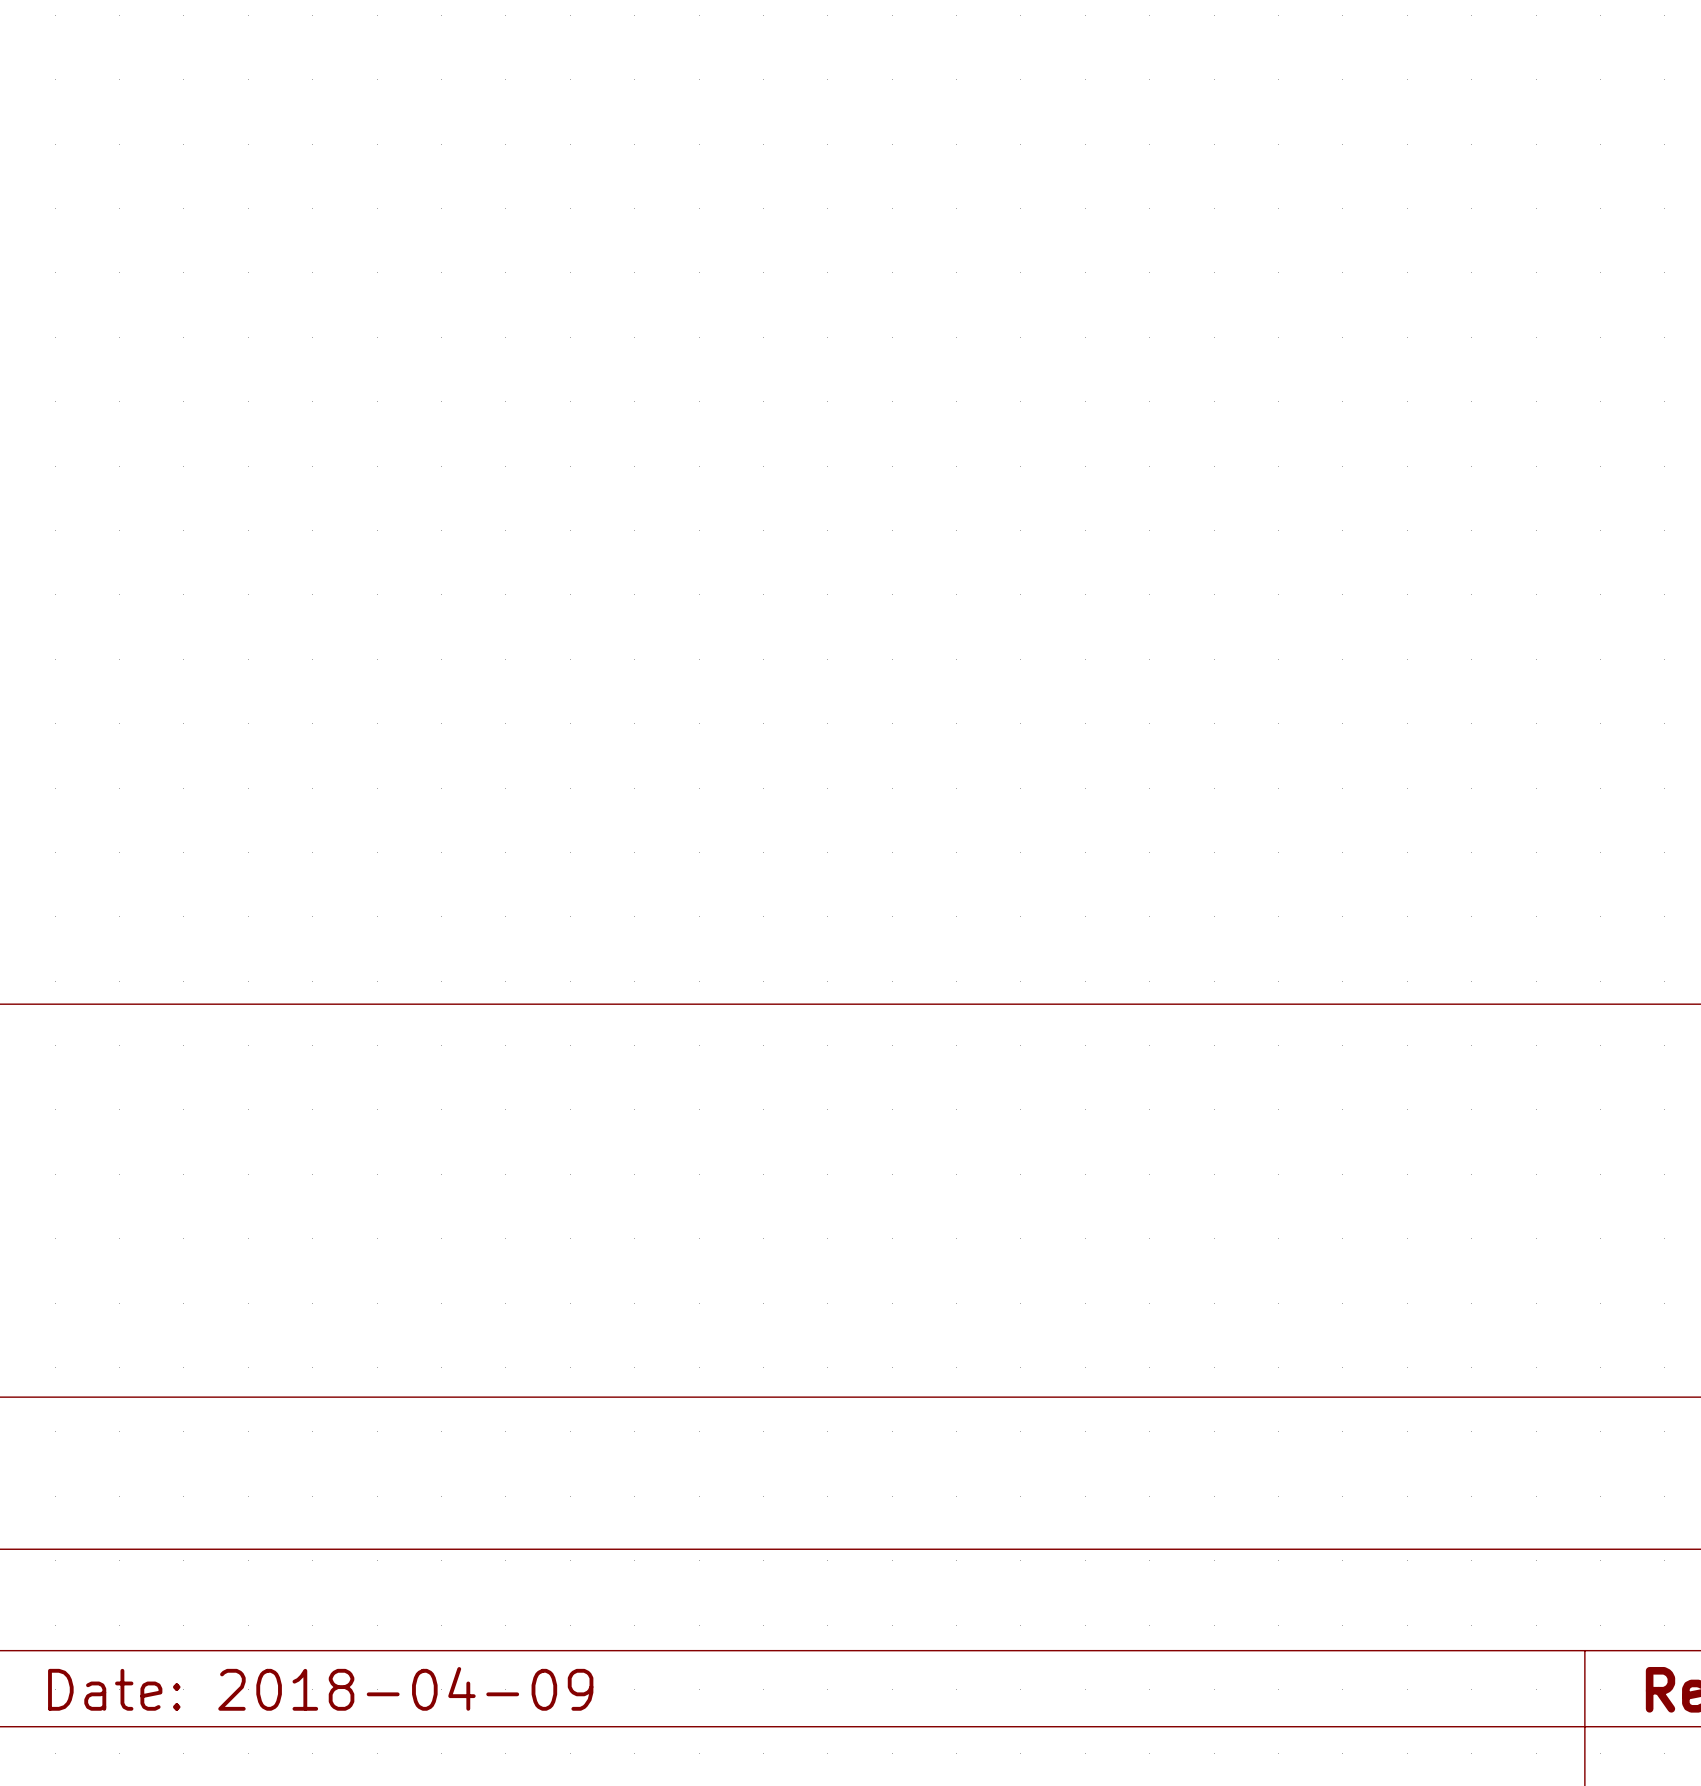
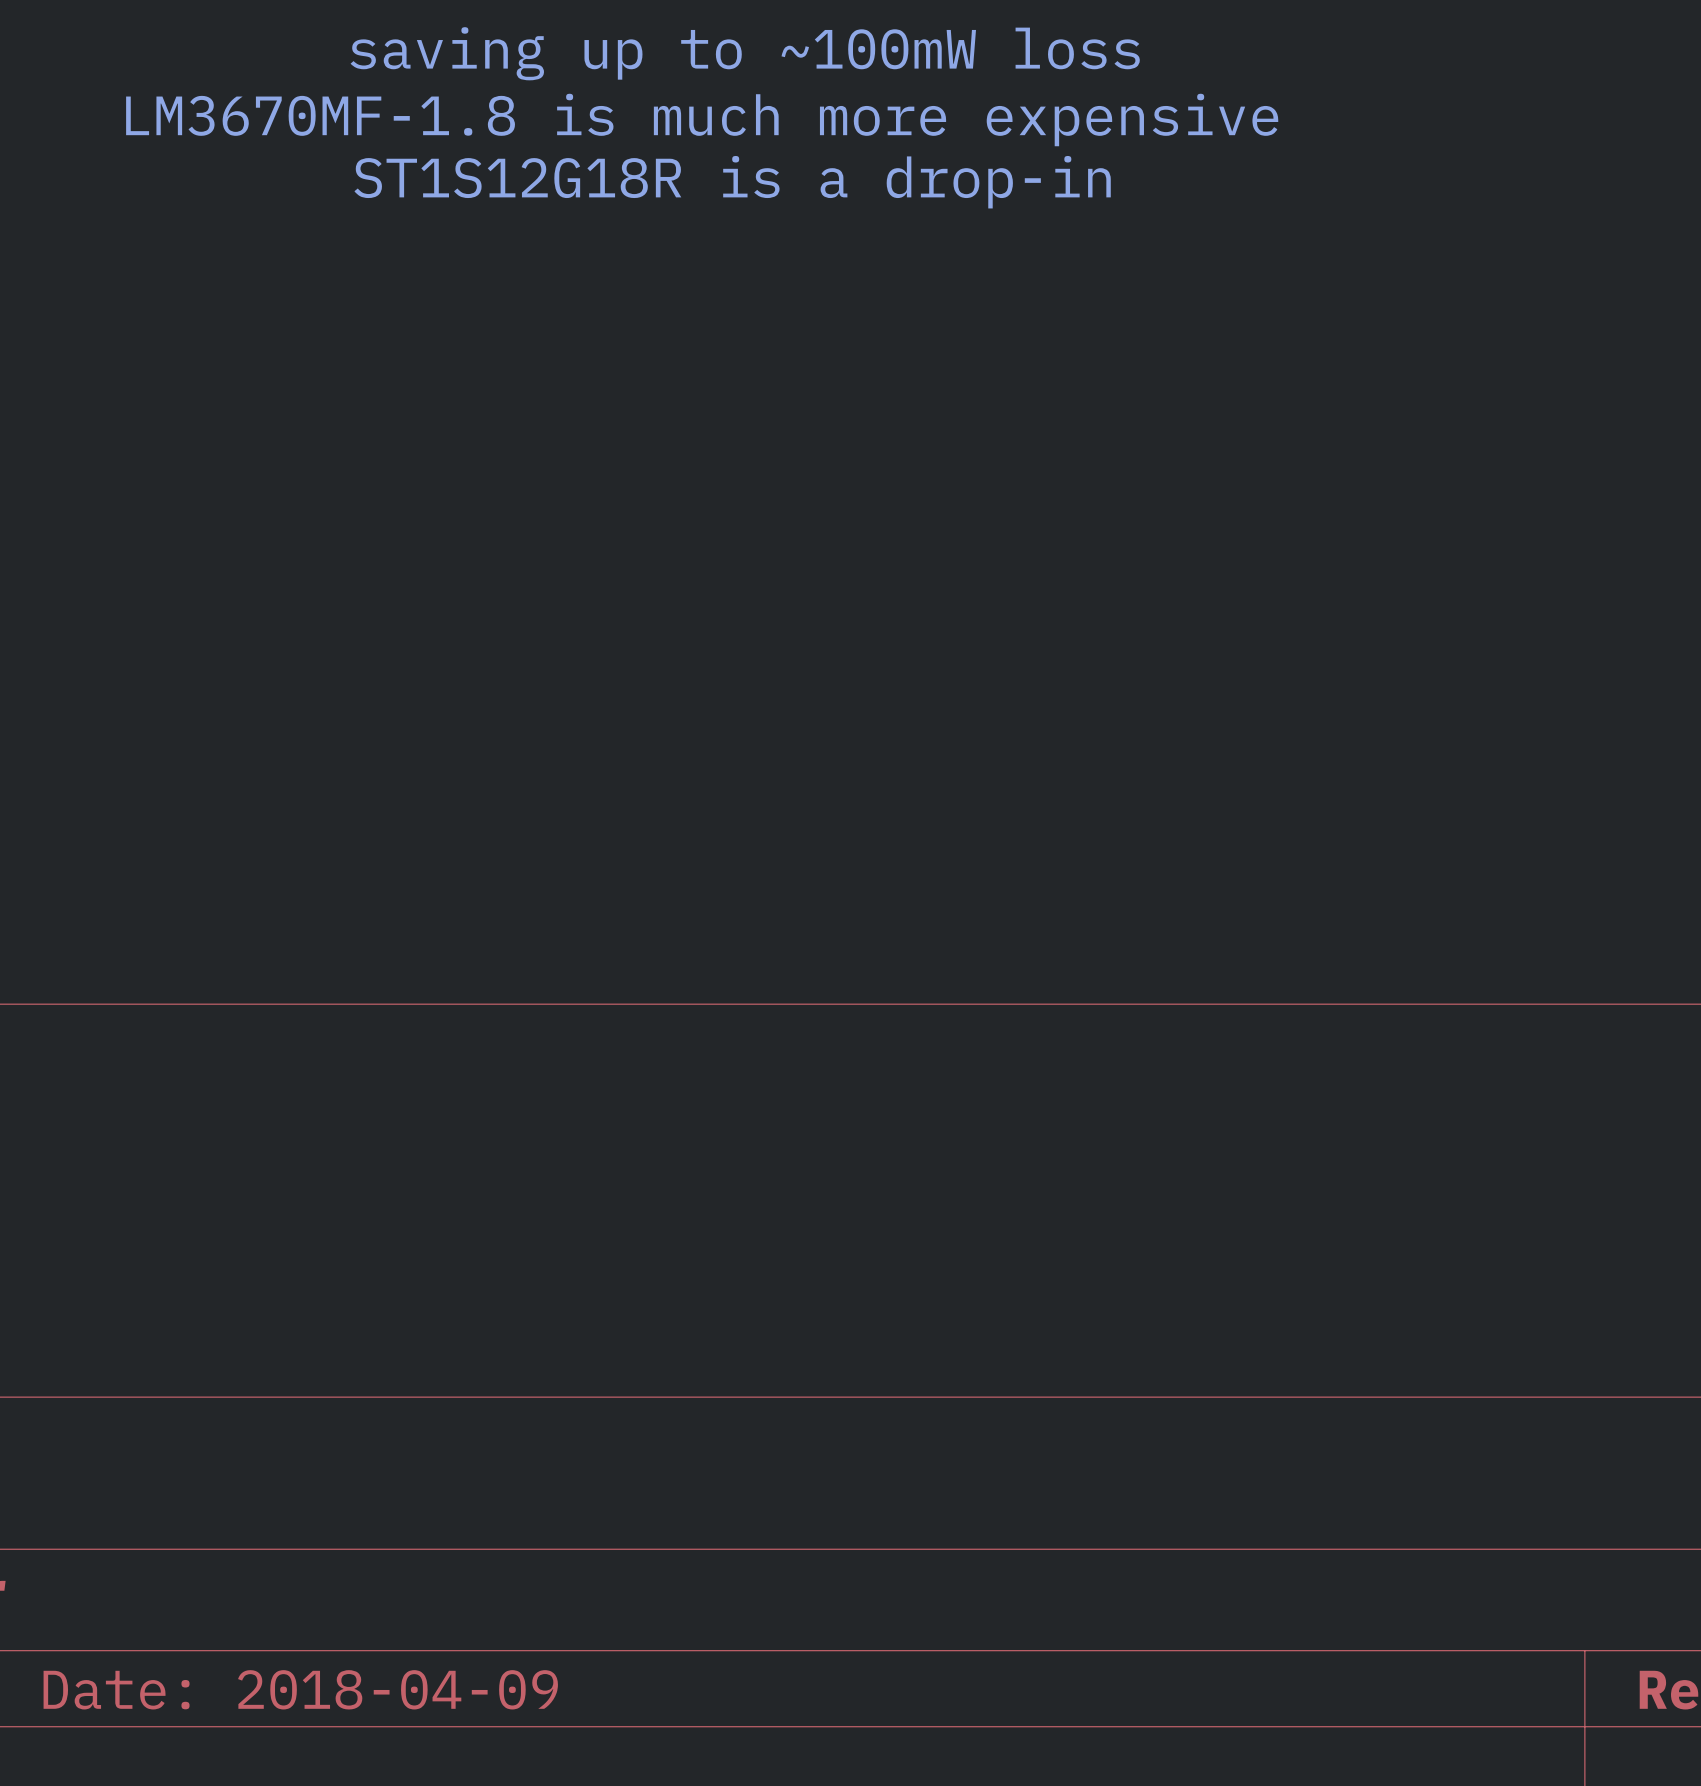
text: none -> saving up to ~100mW loss (745, 53)
text: none -> LM3670MF-1.8 is much more expensive (702, 120)
text: none -> ST1S12G18R is a drop-in (732, 182)

